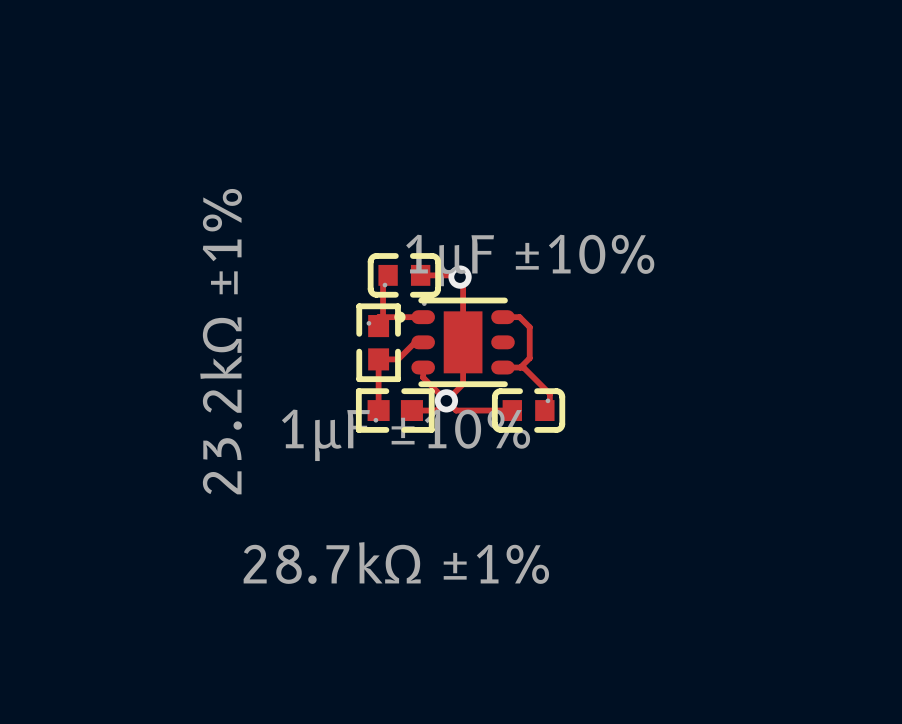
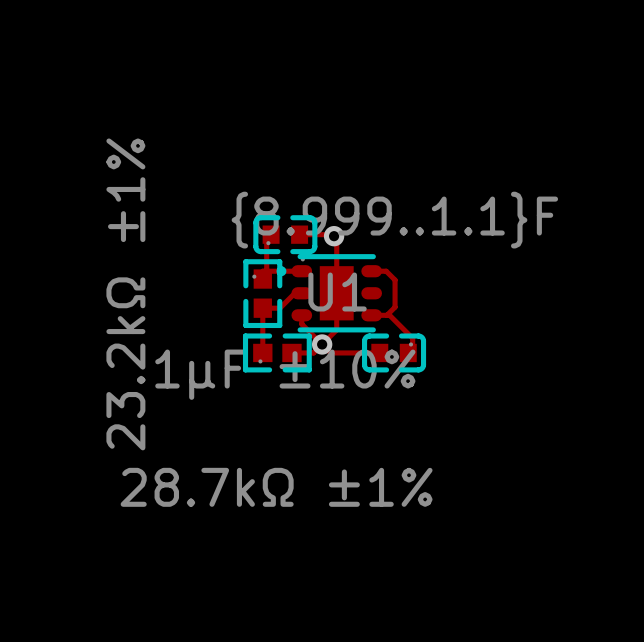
part value: 1µF ±10% (530, 260) -> {8.999..1.1}F (394, 220)
U1 name: none -> U1 (337, 292)

